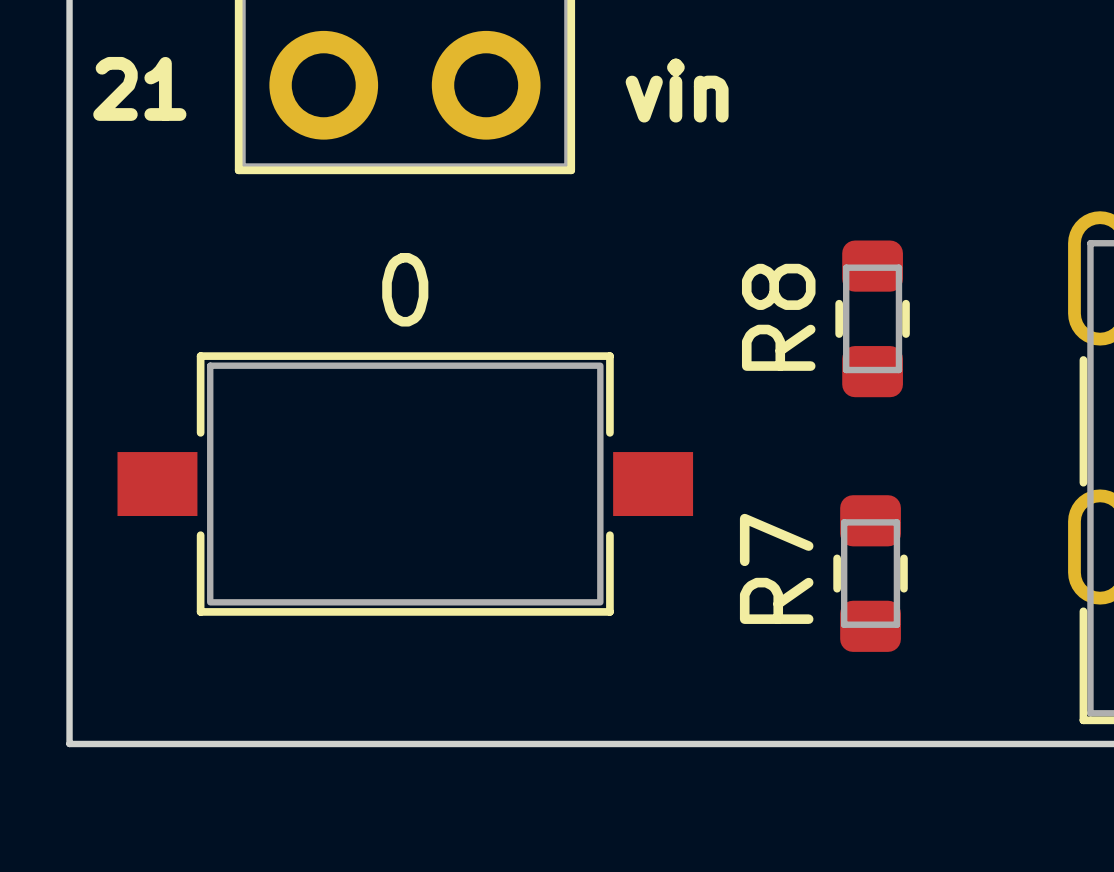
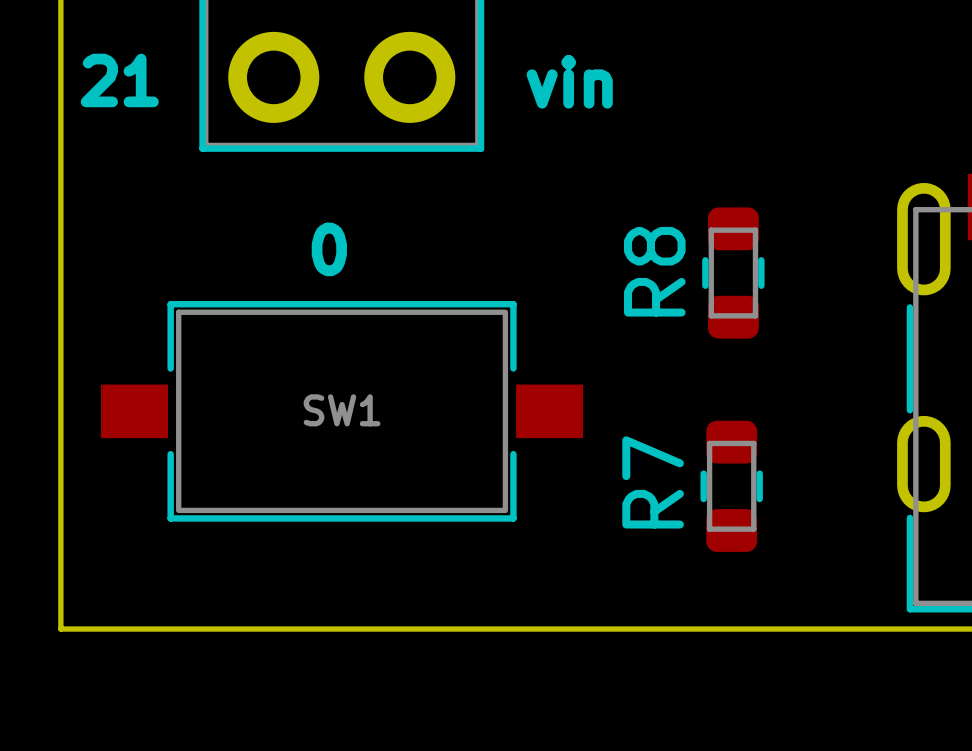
0 name: 0 (405, 289) -> SW1 (342, 410)
text: none -> 0 (329, 249)

